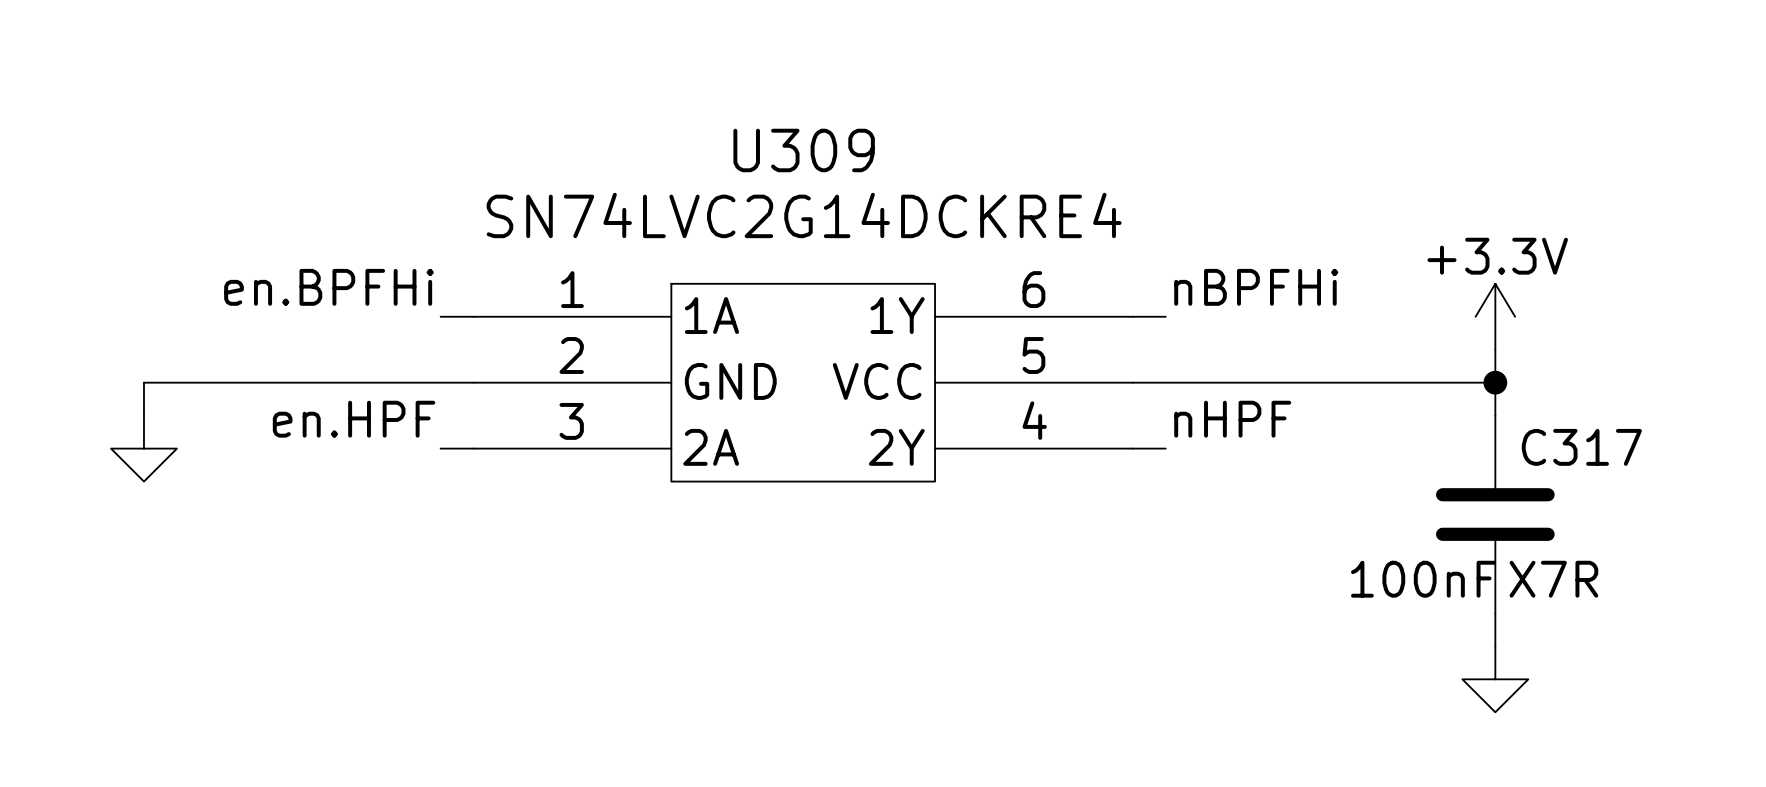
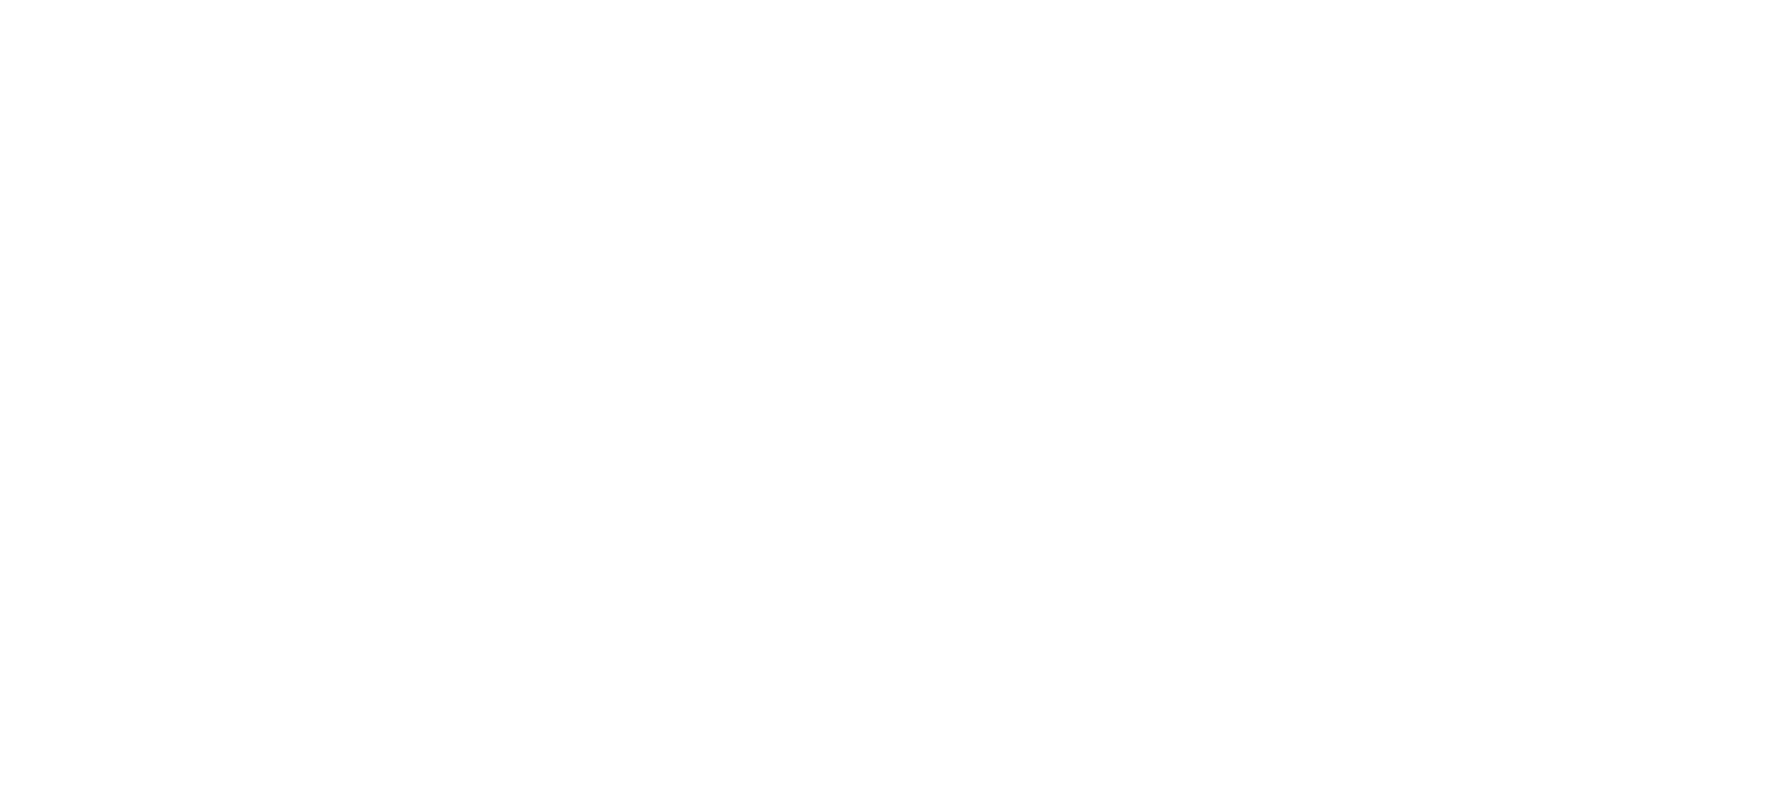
label: en.BPFHi (328, 287) -> none
label: nBPFHi (1256, 287) -> none
wire: (440, 316) (473, 316) -> none
wire: (1132, 316) (1165, 316) -> none
power symbol: +3.3V (1495, 316) -> none
wire: (1495, 349) (1495, 415) -> none
wire: (473, 382) (143, 382) (143, 415) -> none
U309: SN74LVC2G14DCKRE4 (803, 382) -> none
wire: (1132, 382) (1495, 382) -> none
junction: (1495, 382) -> none
label: en.HPF (354, 419) -> none
label: nHPF (1232, 419) -> none
power symbol: (143, 448) -> none
wire: (440, 448) (473, 448) -> none
wire: (1132, 448) (1165, 448) -> none
C317: 100nF (1495, 514) -> none
wire: (1495, 613) (1495, 646) -> none
power symbol: (1495, 679) -> none

